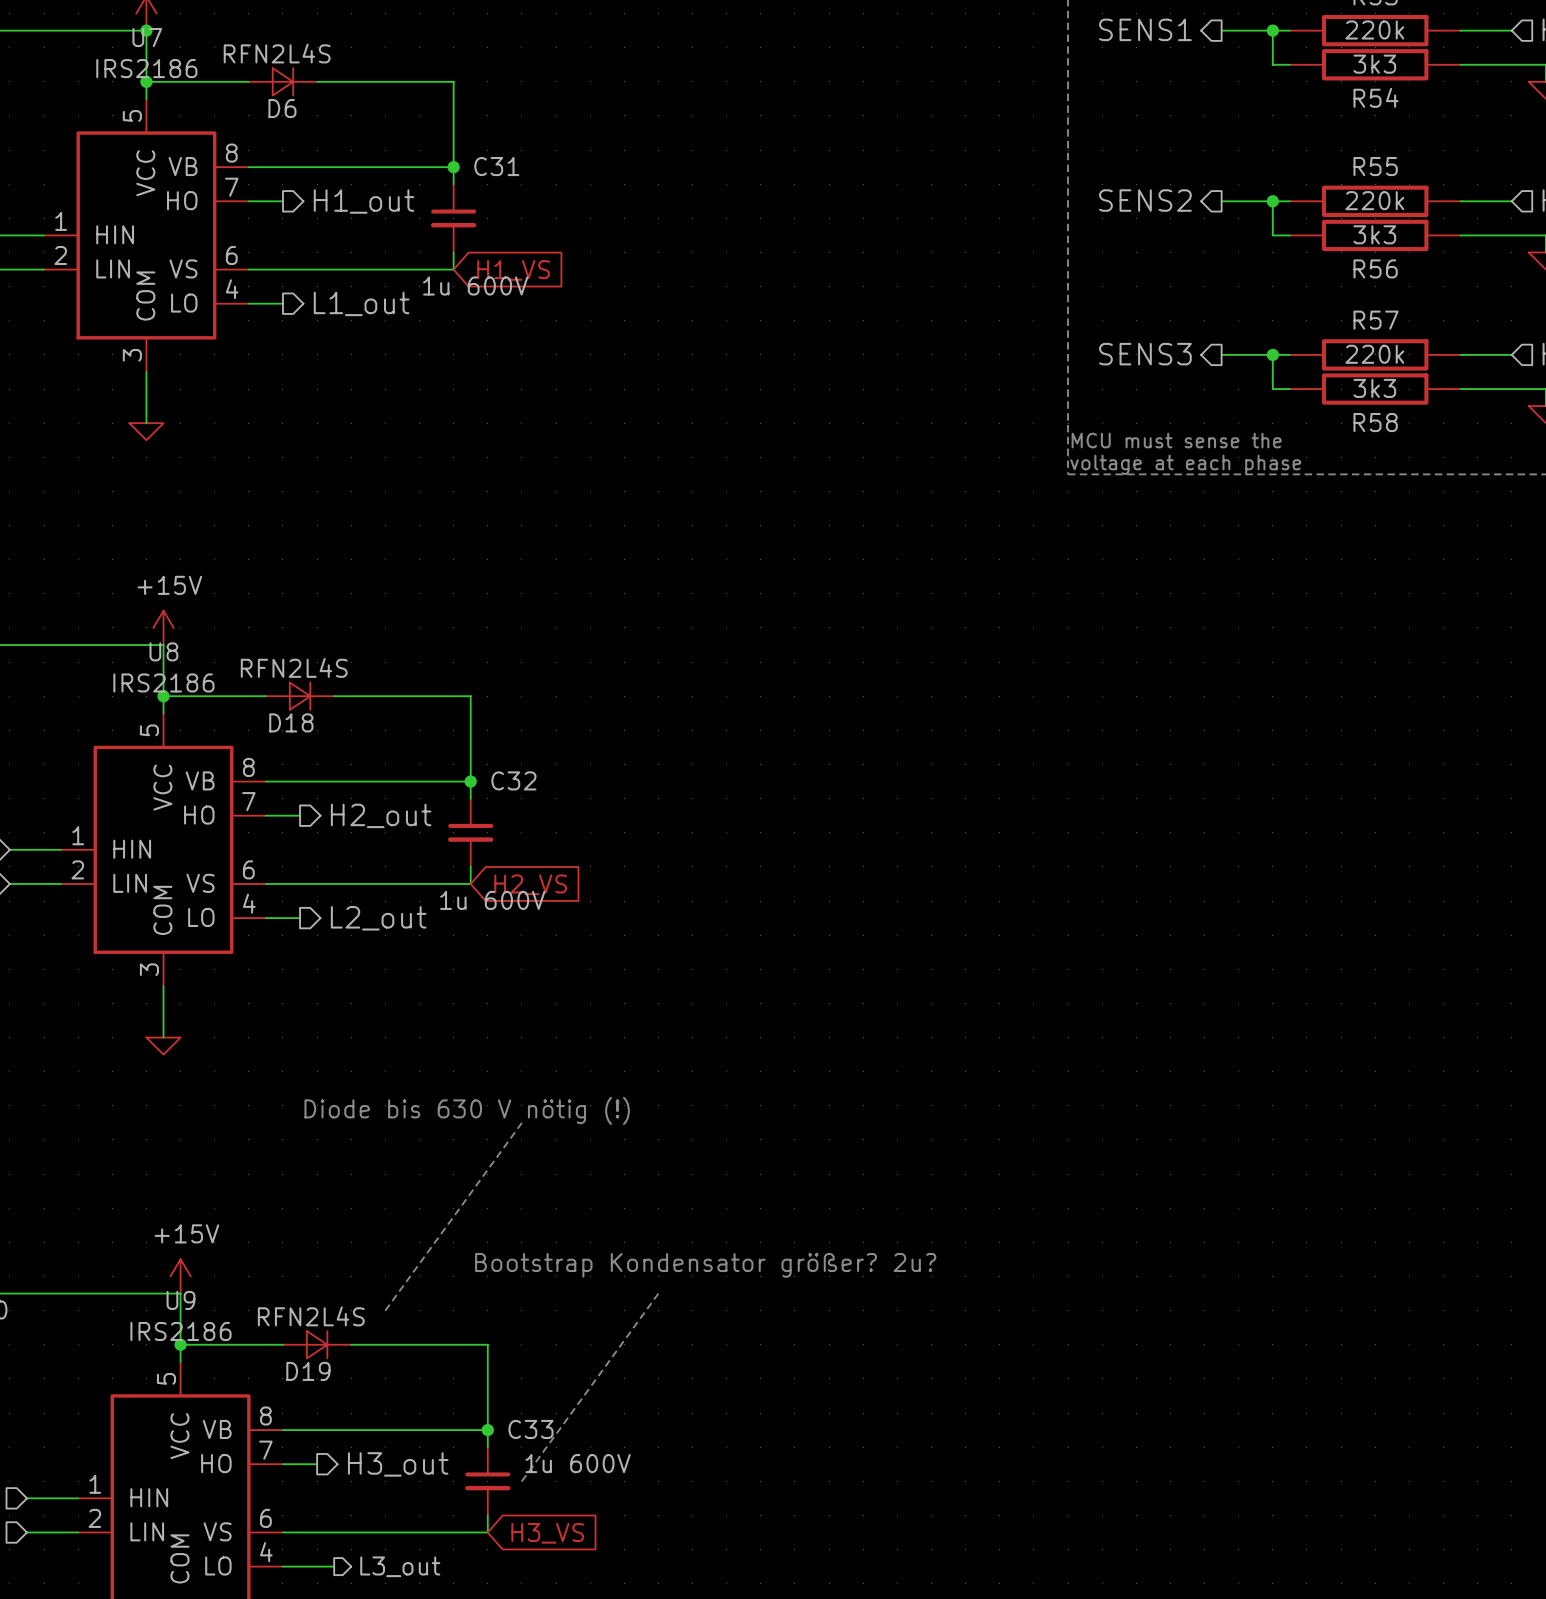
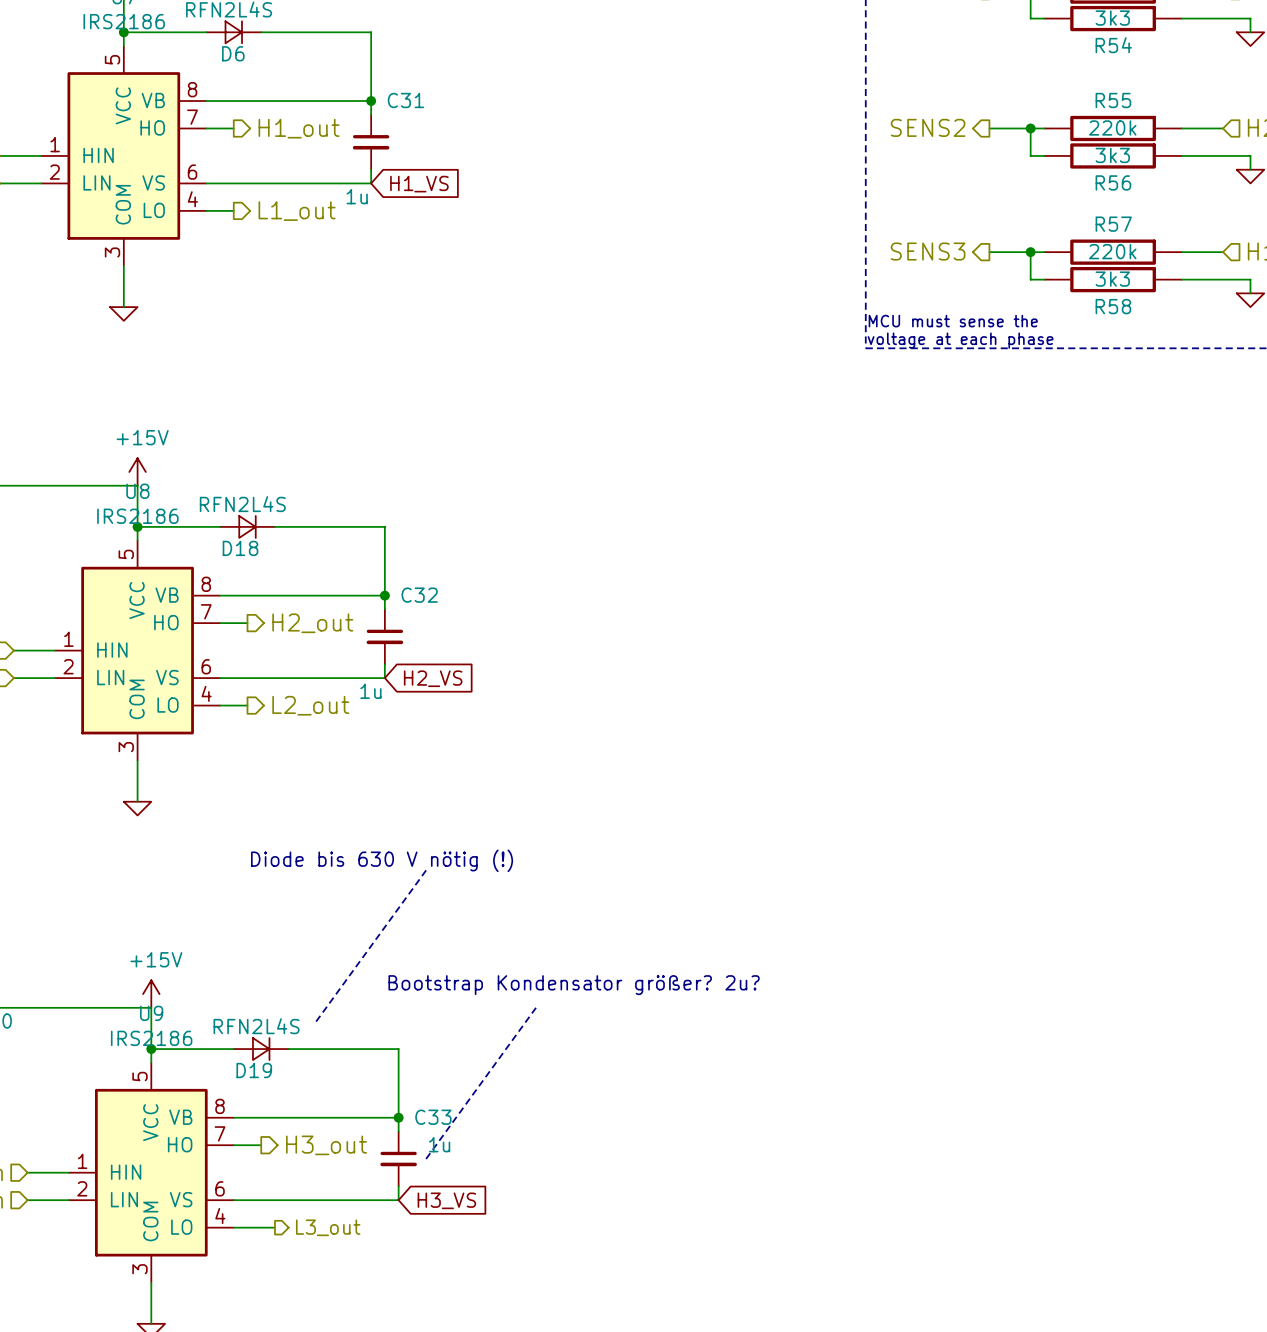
C31 value: 1u 600V (475, 286) -> 1u (357, 196)
C32 value: 1u 600V (492, 900) -> 1u (370, 691)
C33 value: 1u 600V (578, 1463) -> 1u (439, 1144)

